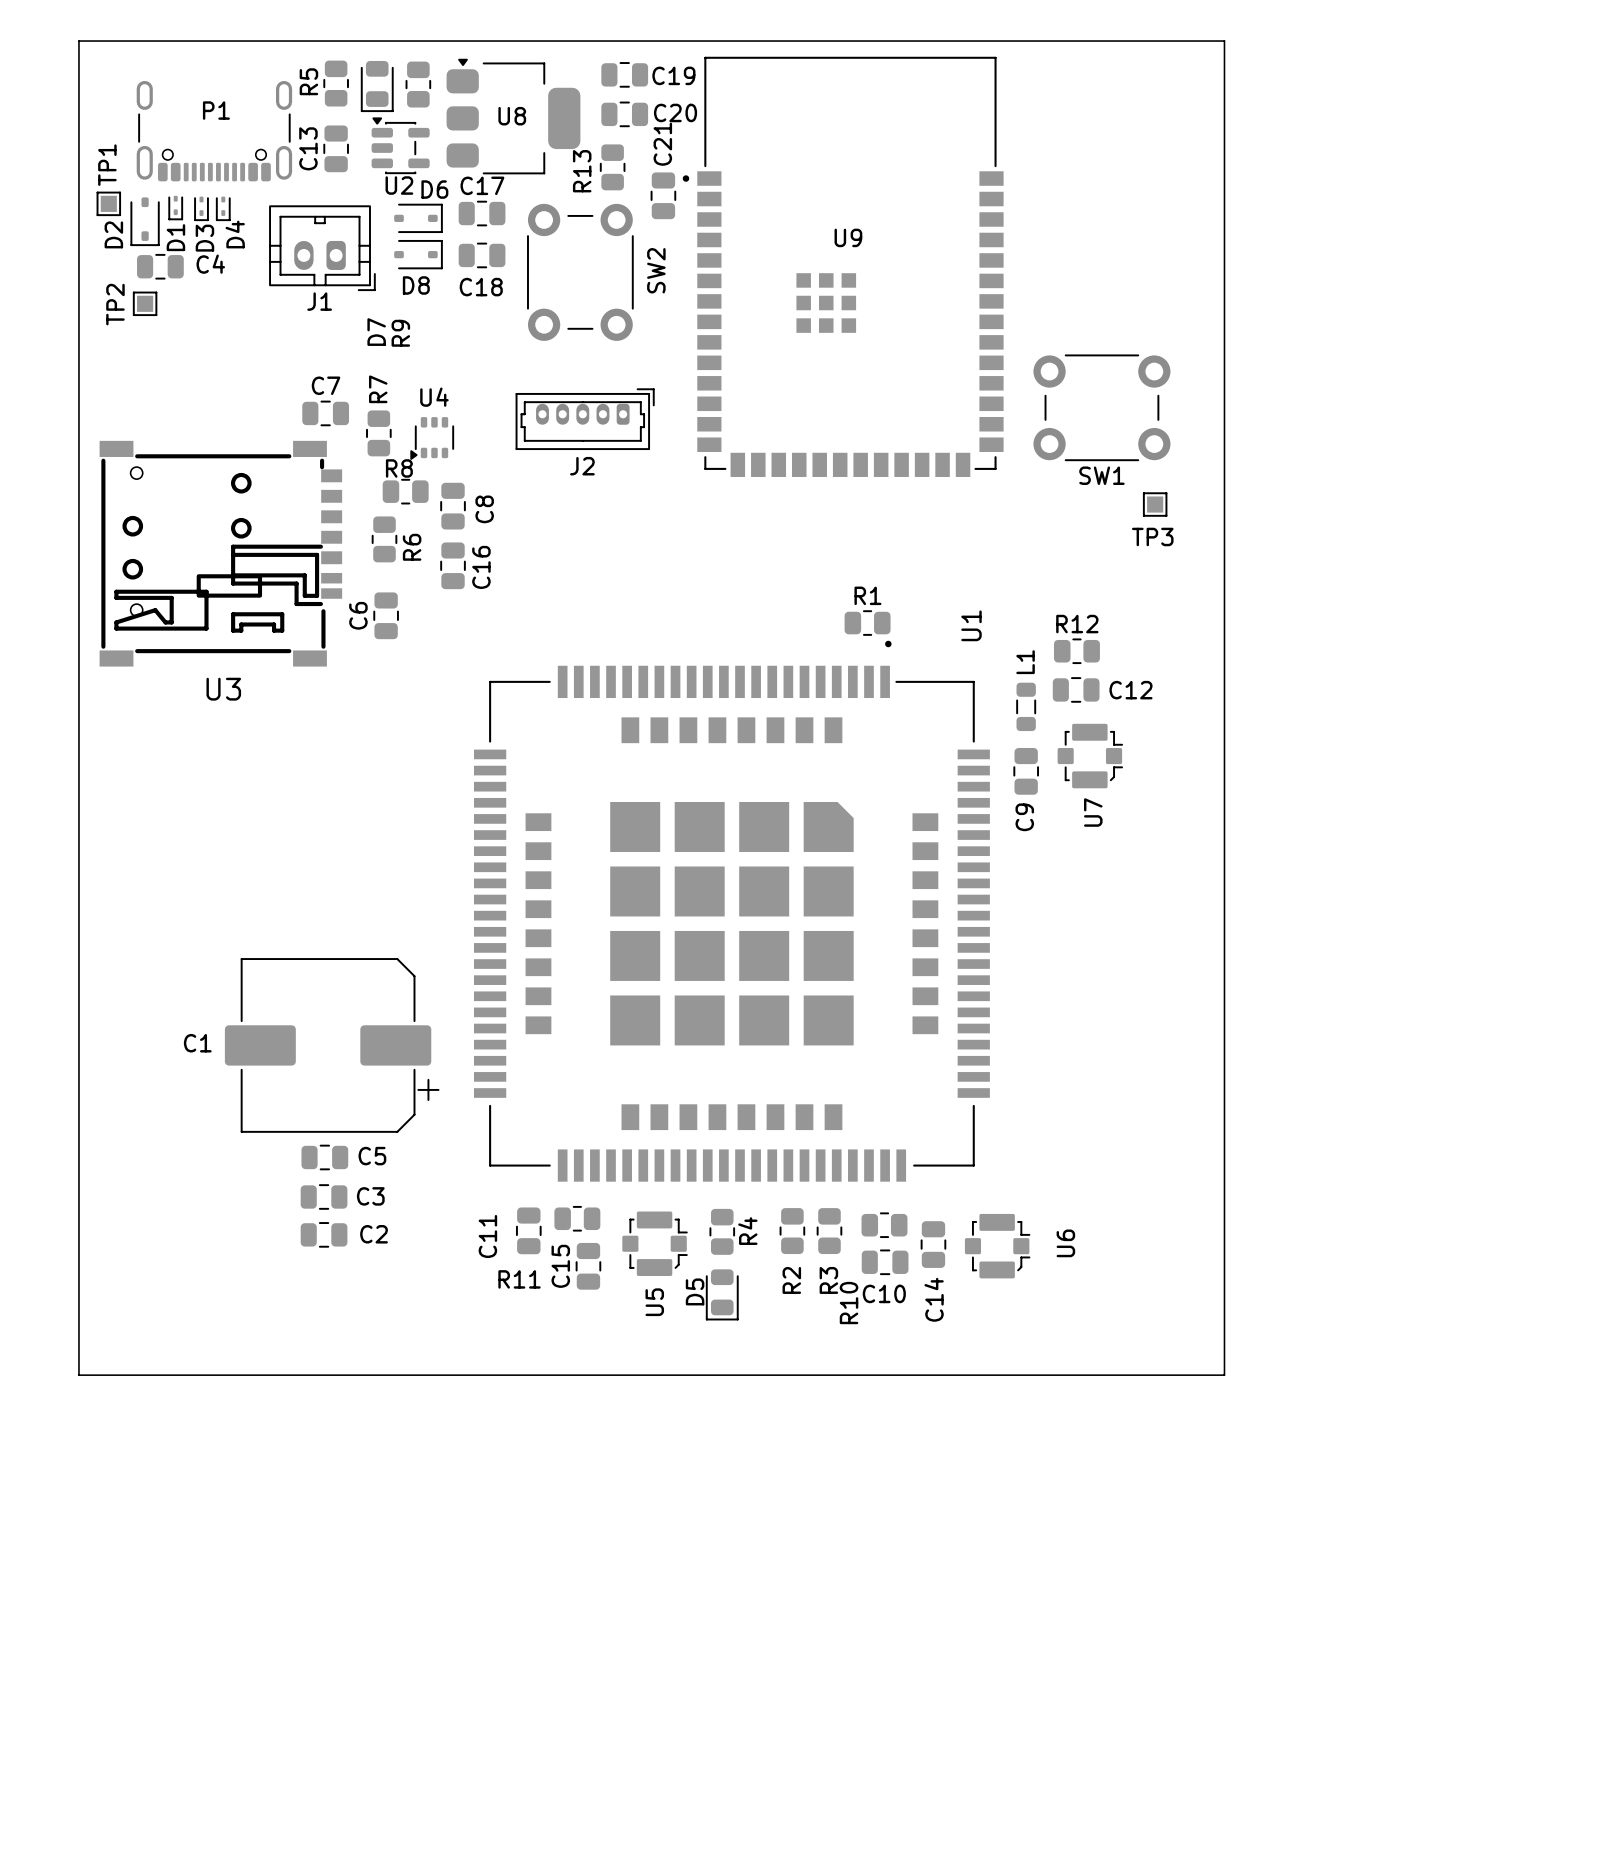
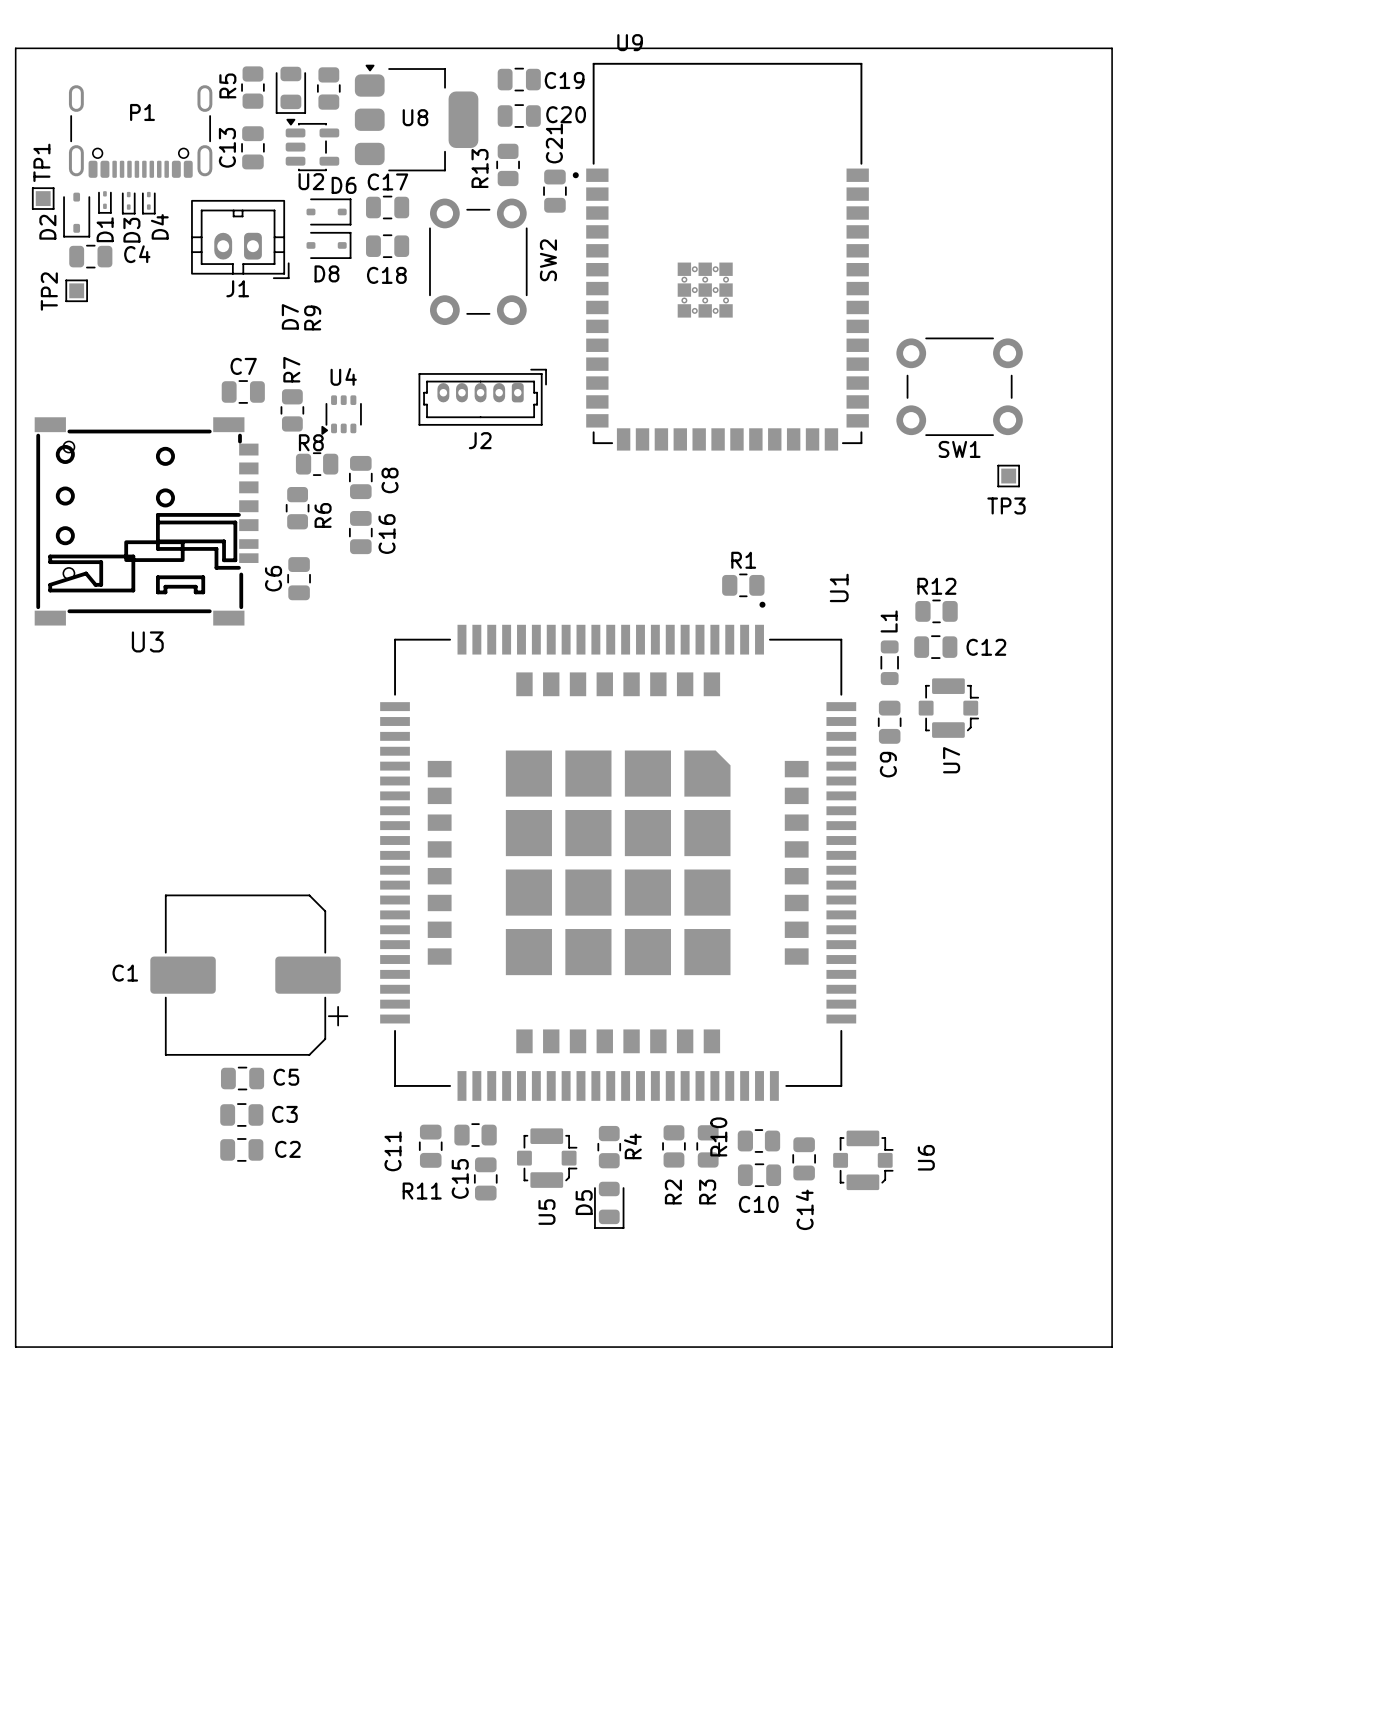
board edge: (1224, 41) (1224, 1375) (78, 1375) -> (1072, 48) (1112, 48) (1112, 1347) (15, 1347) (15, 1279)
U9 footprint: [682, 56, 1004, 477] -> [572, 62, 869, 451]
U9 name position: U9 (848, 237) -> U9 (630, 42)
U3 footprint: [99, 440, 343, 667] -> [34, 417, 259, 626]
R10 name position: R10 (849, 1303) -> R10 (718, 1136)

